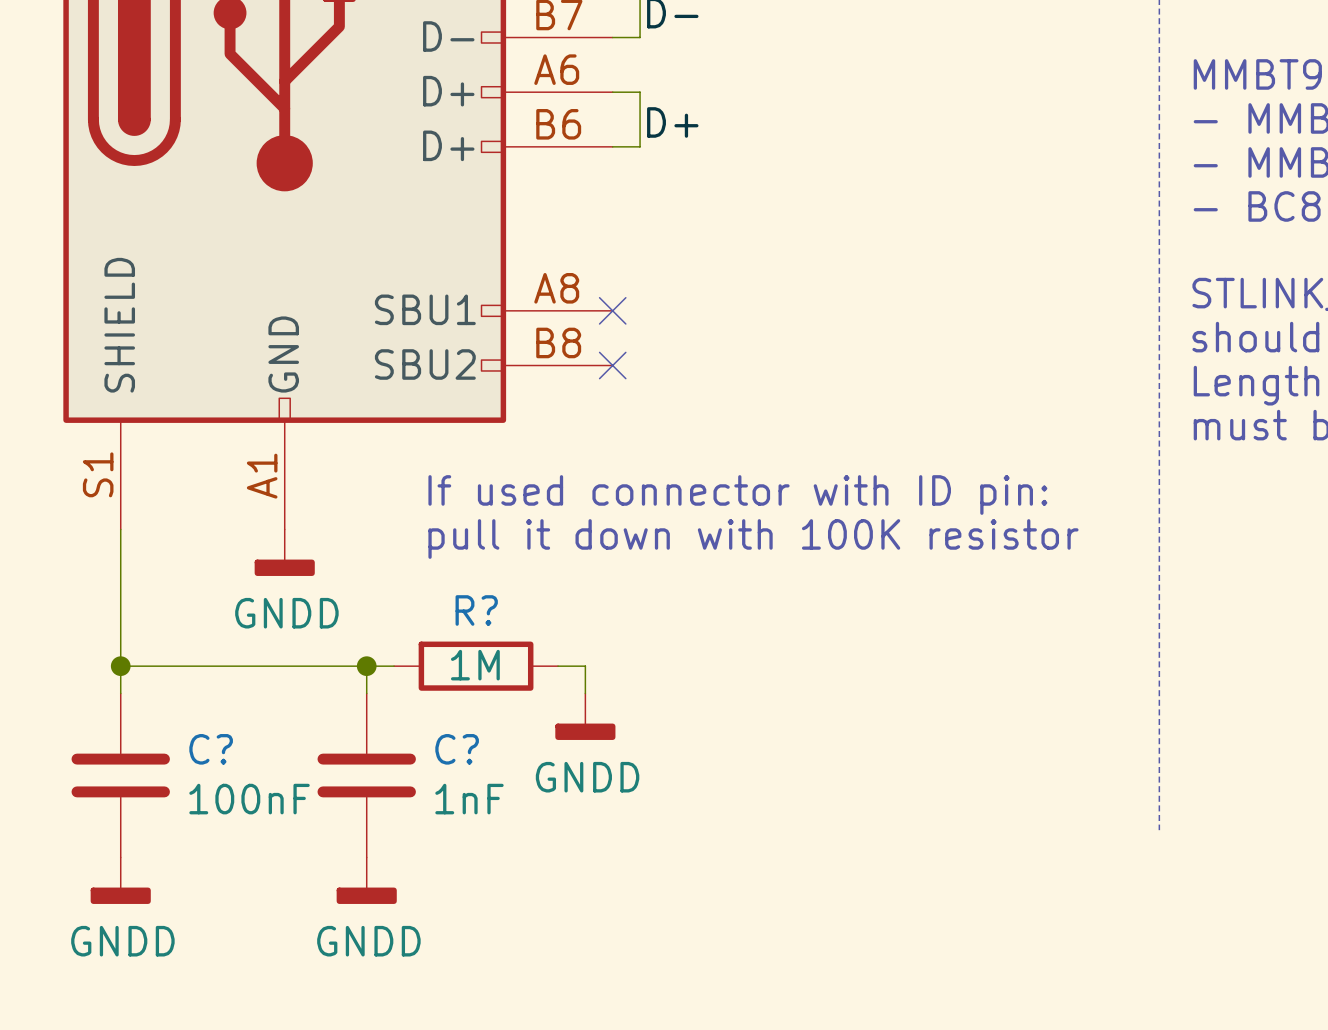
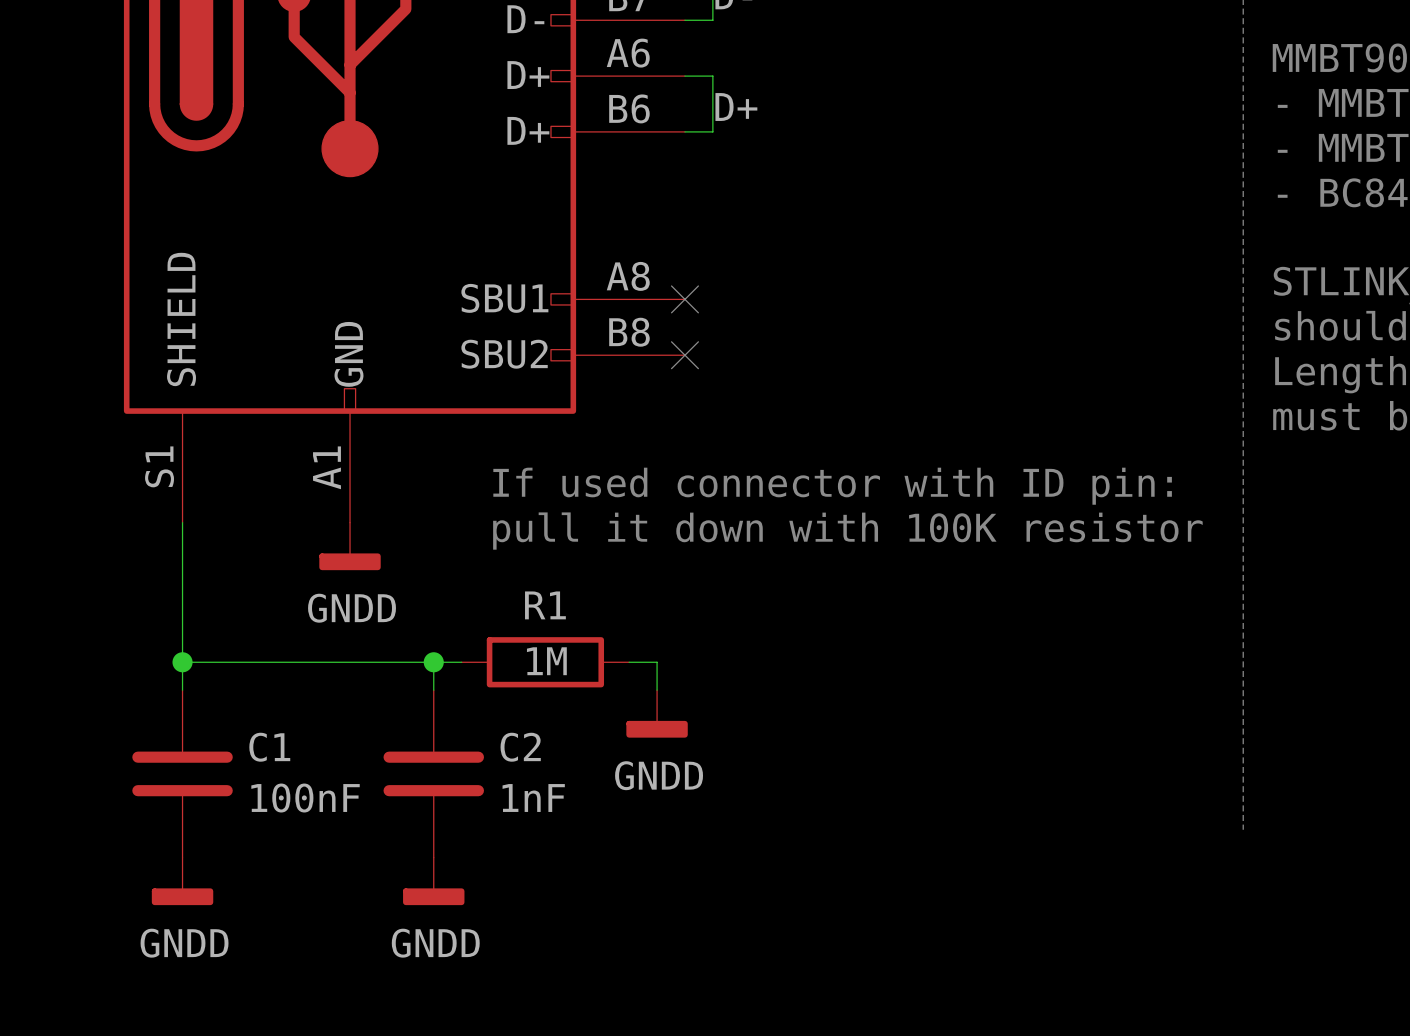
R? name: R? (476, 610) -> R1 (545, 605)
C? name: C? (211, 749) -> C1 (269, 747)
C? name: C? (457, 749) -> C2 (520, 747)

